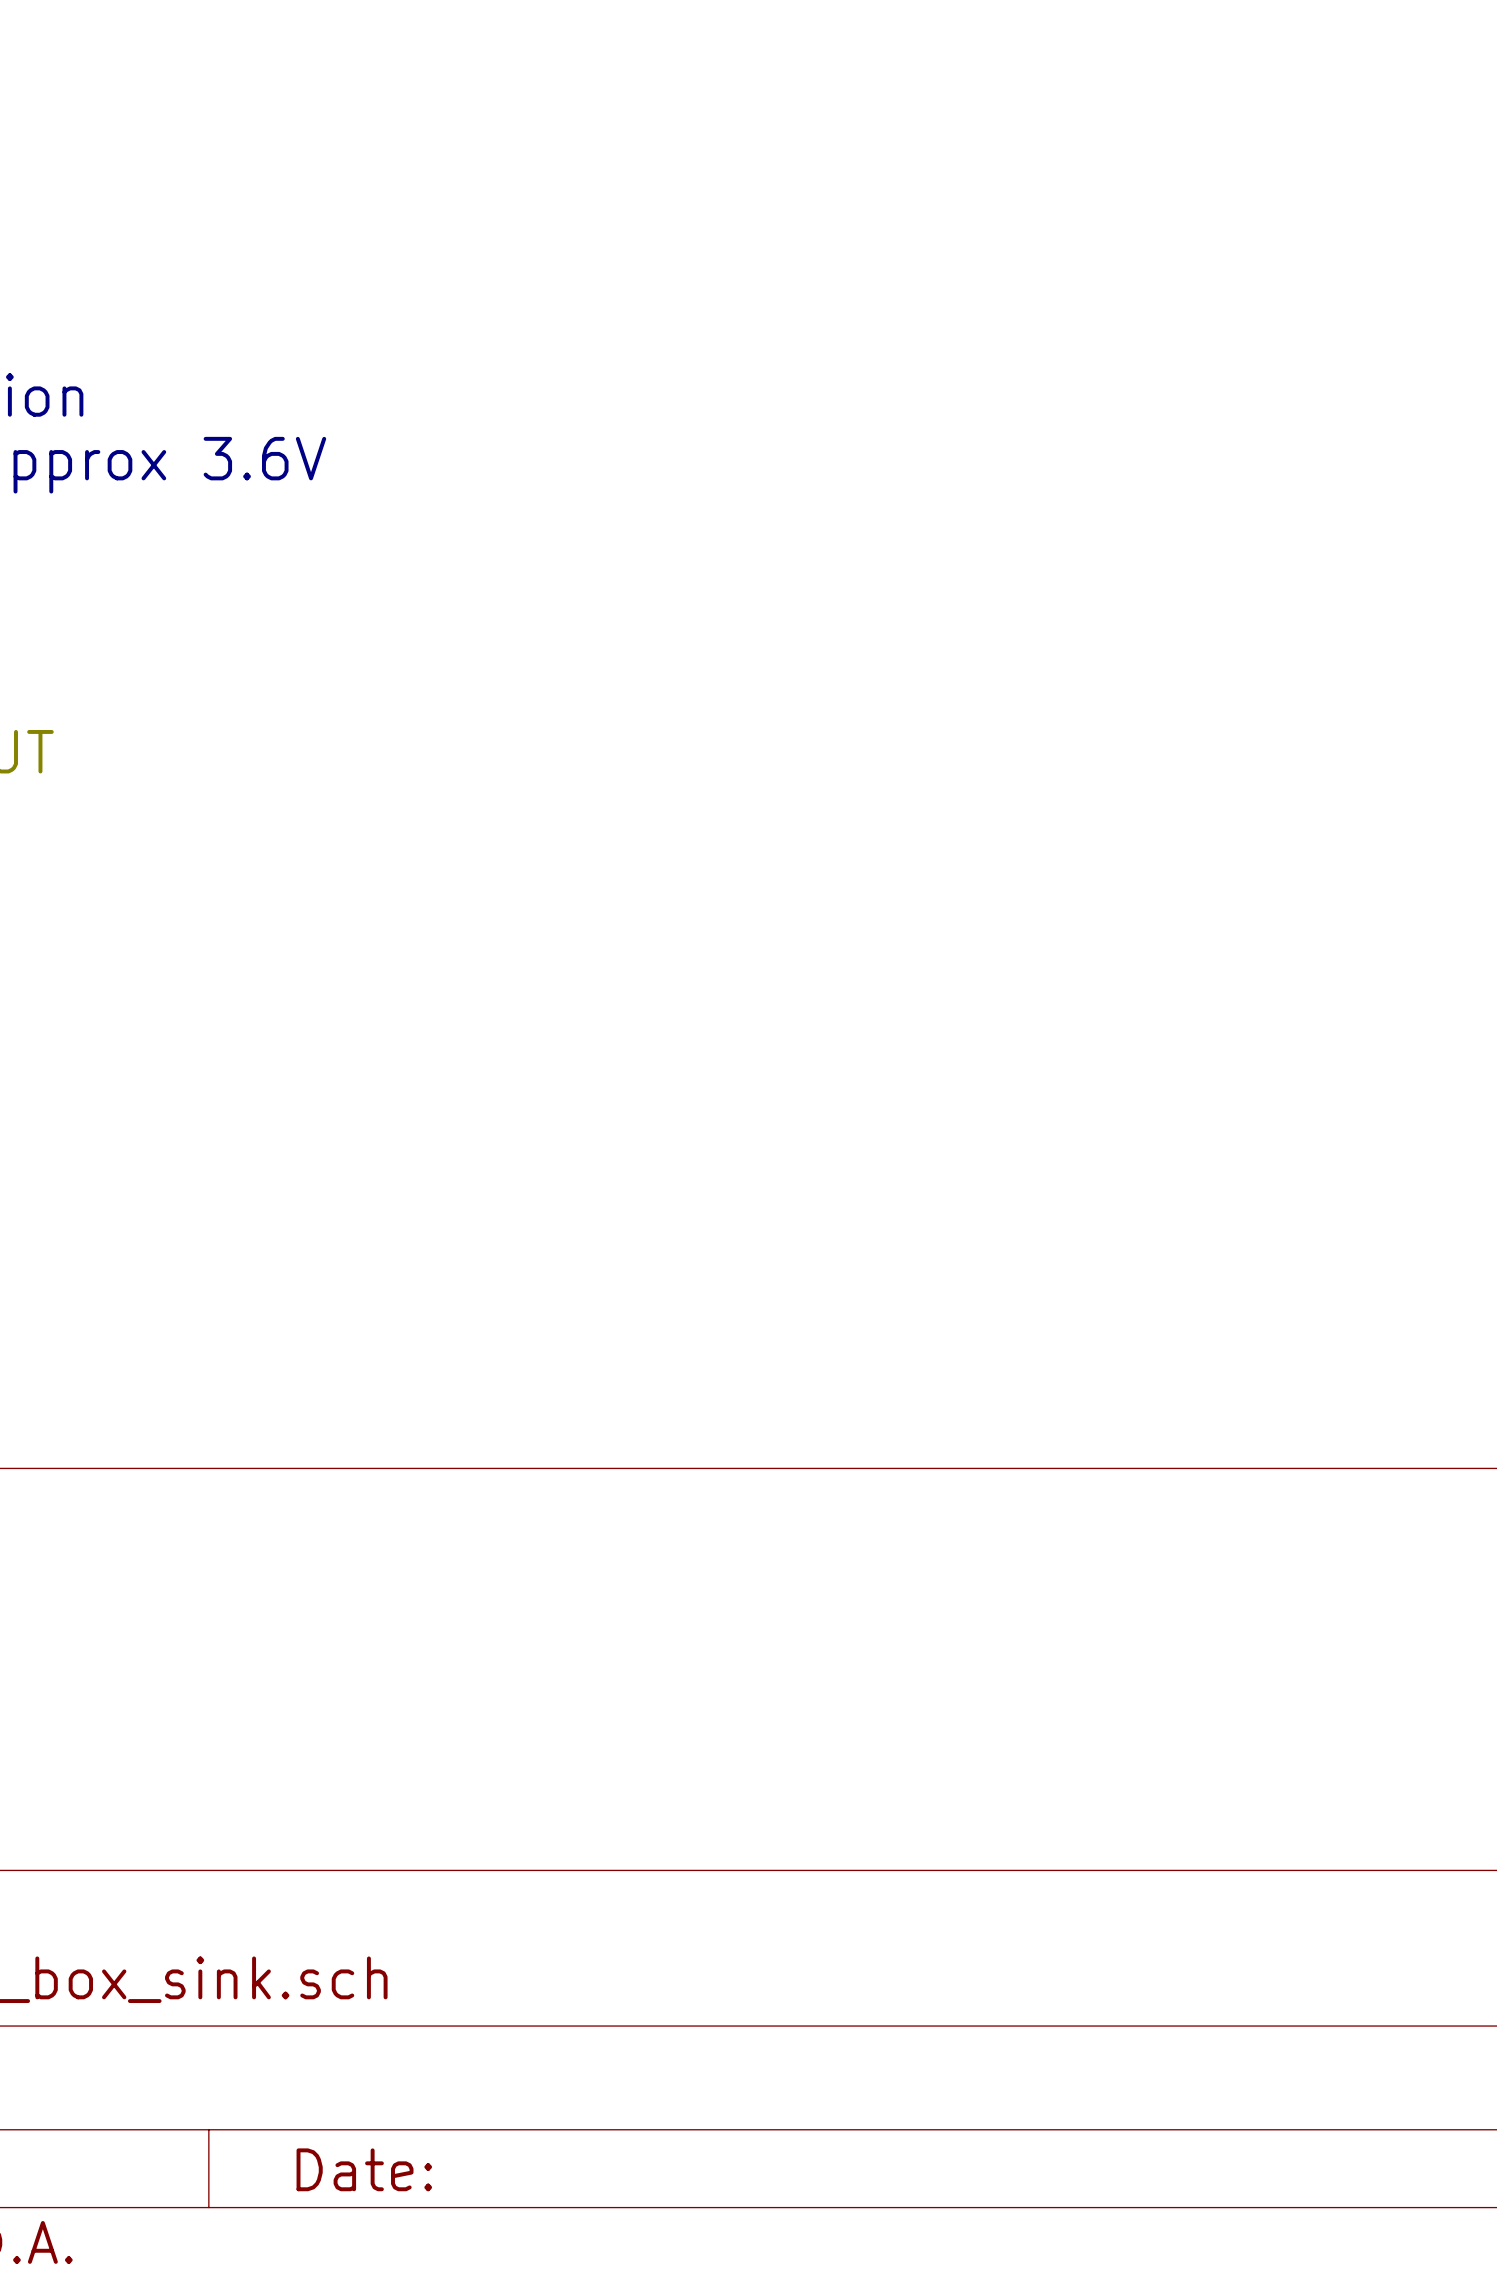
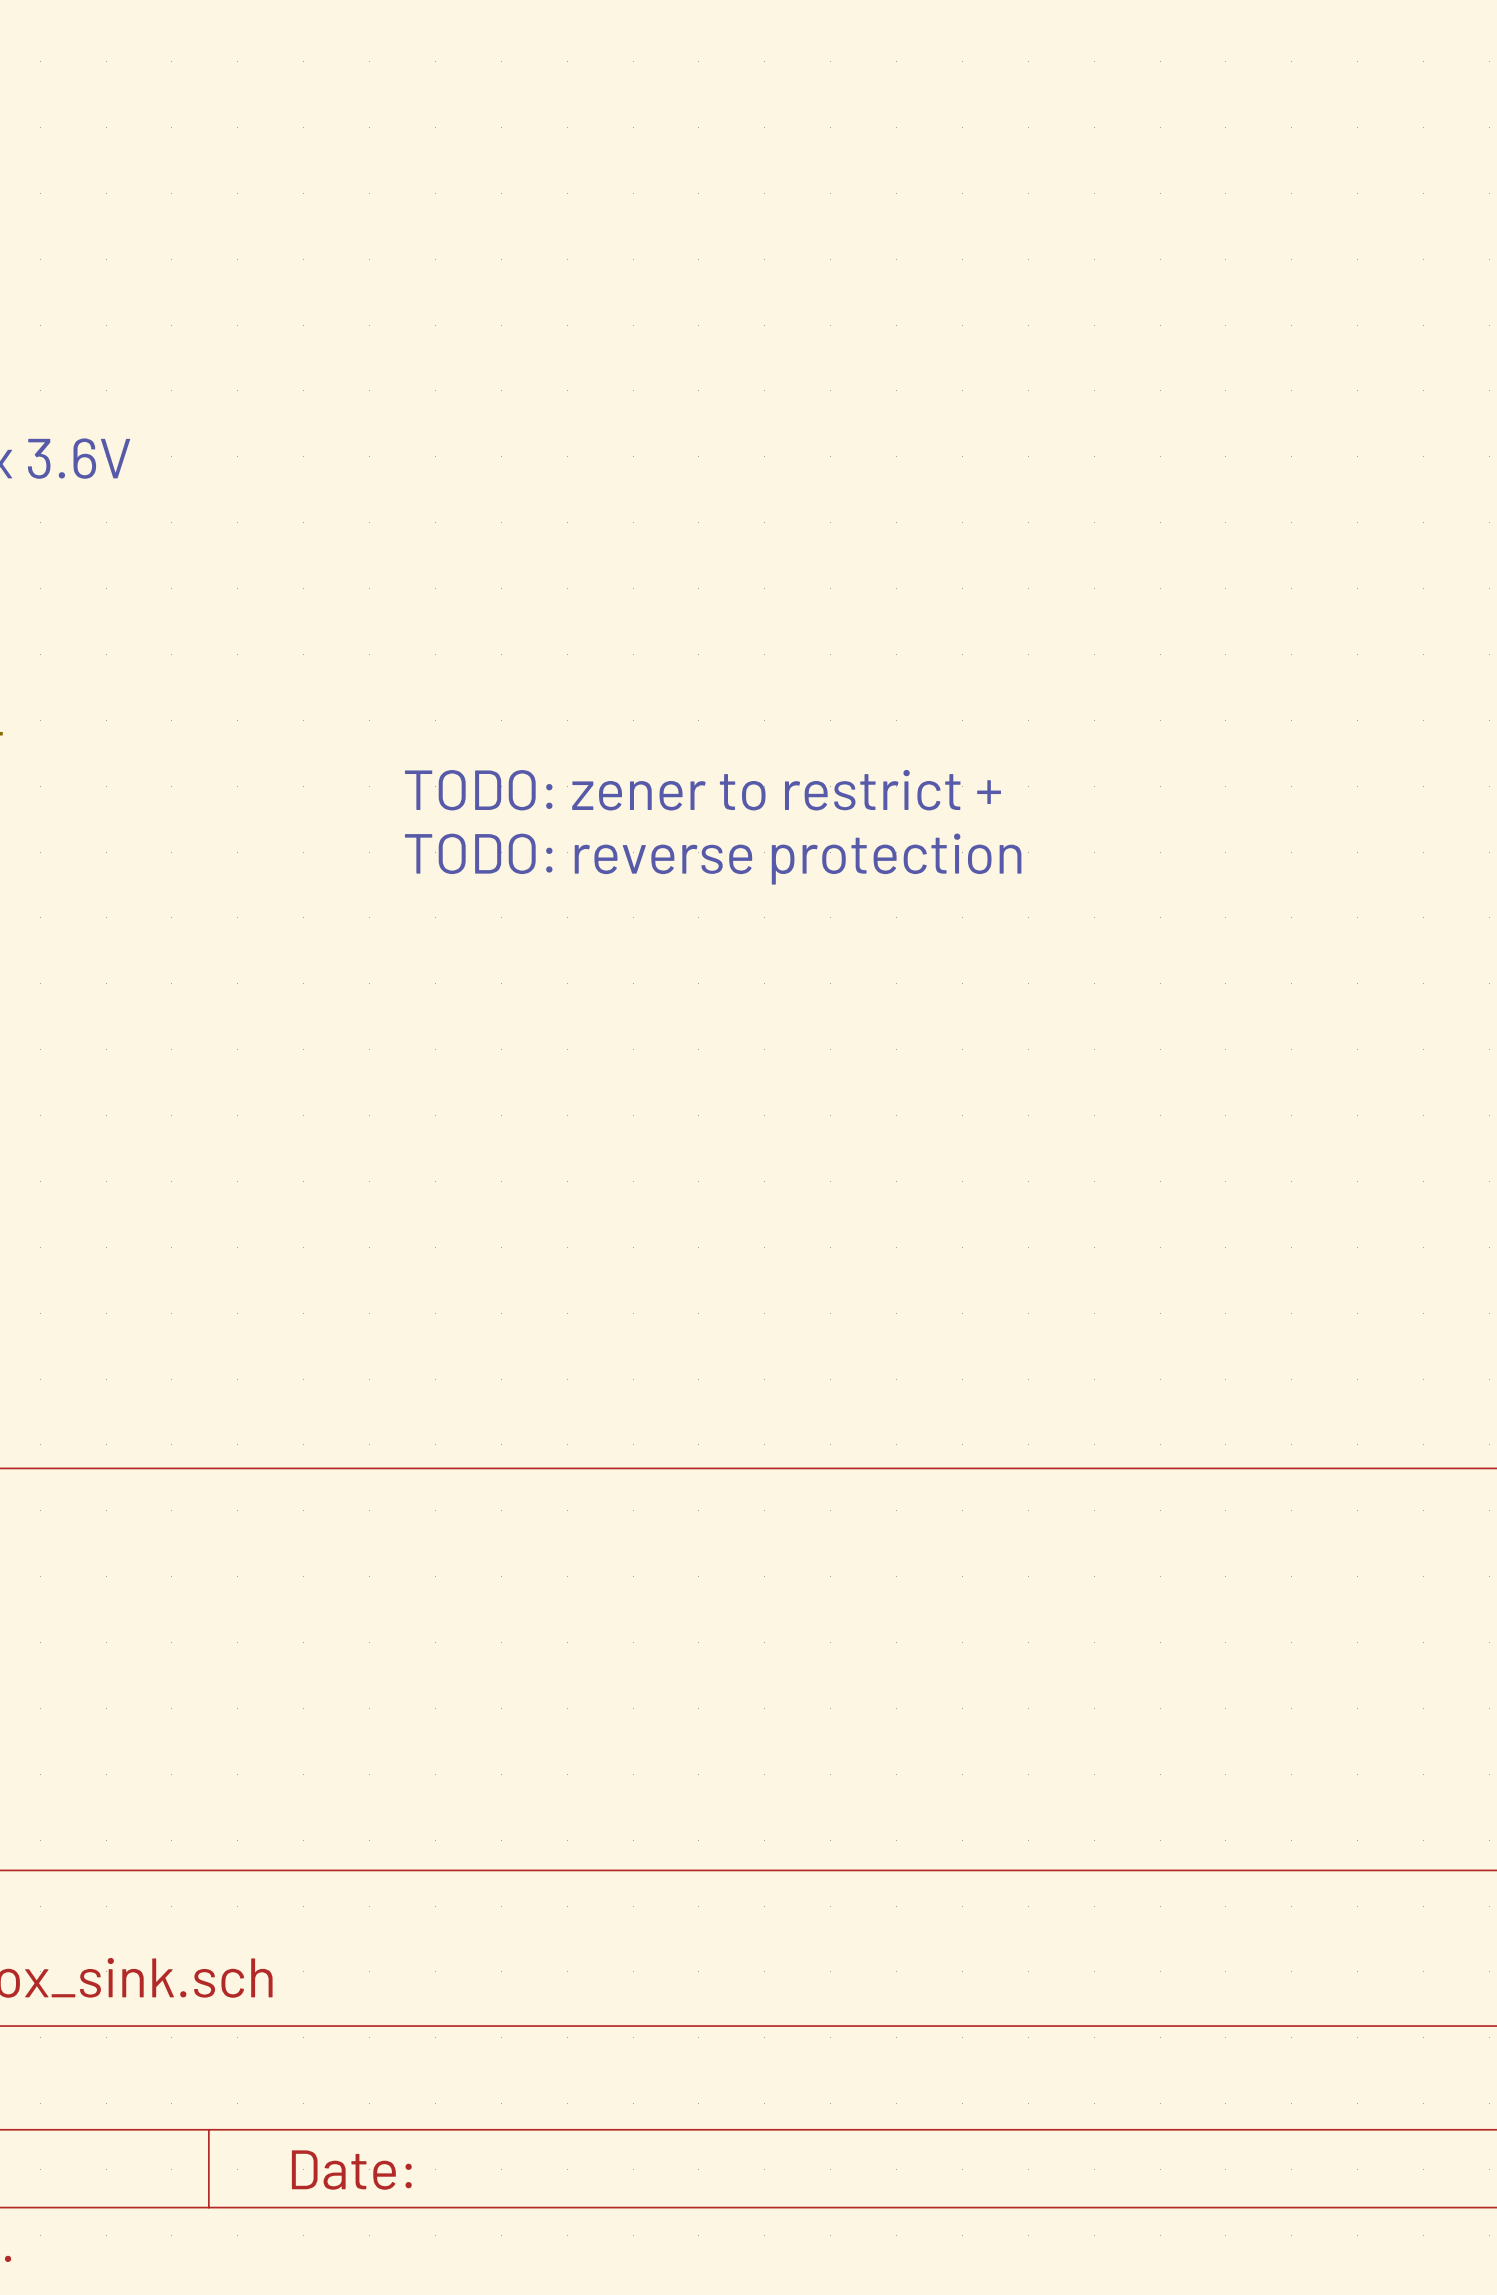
text: none -> TODO: zener to restrict + (702, 790)
text: none -> TODO: reverse protection (713, 859)

